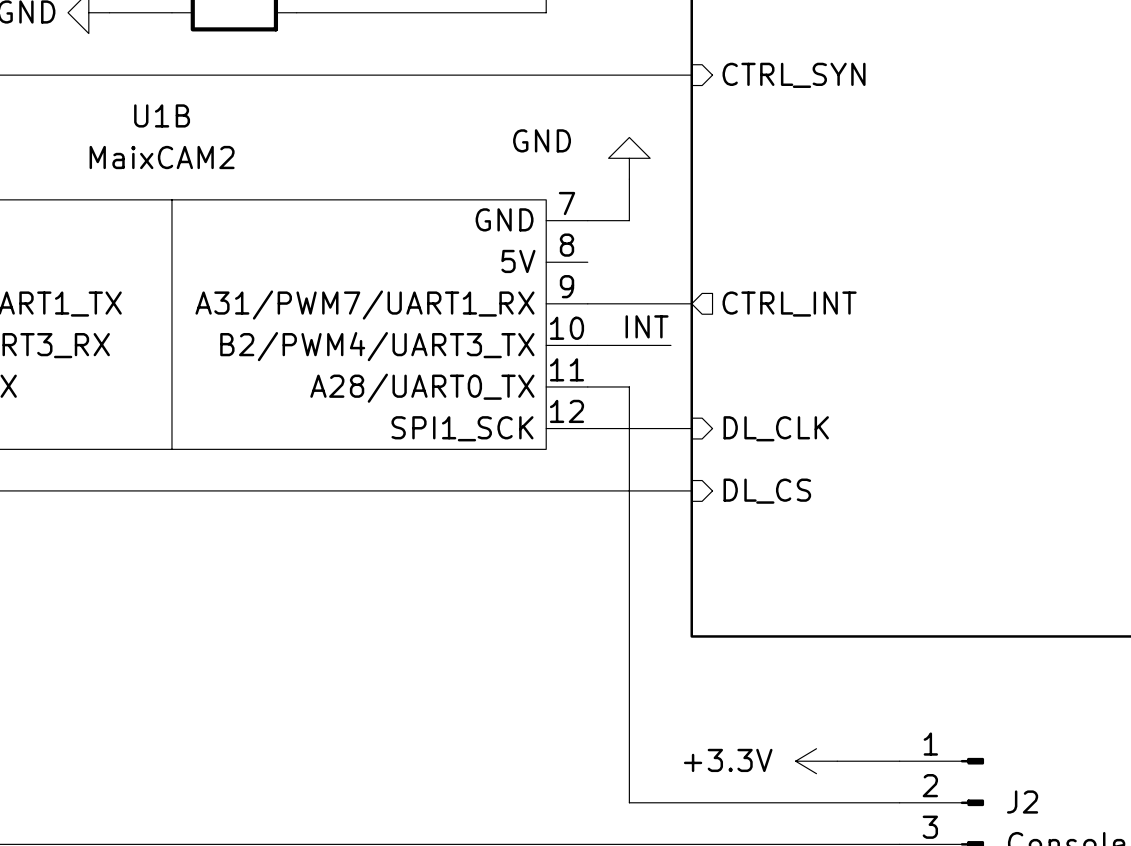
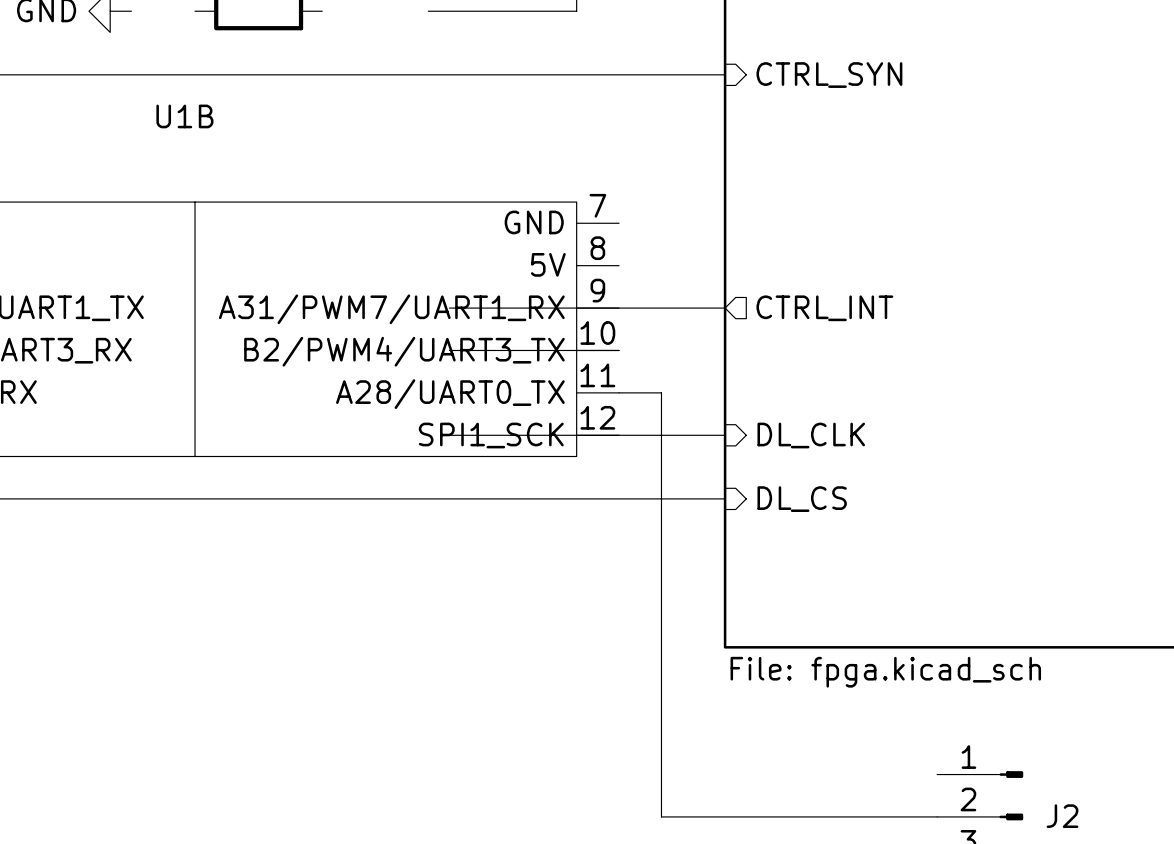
wire: (109, 12) (171, 12) -> none
wire: (296, 12) (400, 12) -> none
U1B value: MaixCAM2 (162, 157) -> none
power symbol: GND (629, 158) -> none
wire: (629, 179) (629, 220) (587, 220) -> none
wire: none -> (449, 308) (619, 308)
label: INT (647, 326) -> none
wire: (587, 345) (670, 345) -> (619, 350) (449, 350)
wire: none -> (449, 435) (619, 435)
sheet value: none -> File: fpga.kicad_sch (885, 672)
power symbol: +3.3V (816, 761) -> none
wire: (837, 761) (899, 761) -> none

